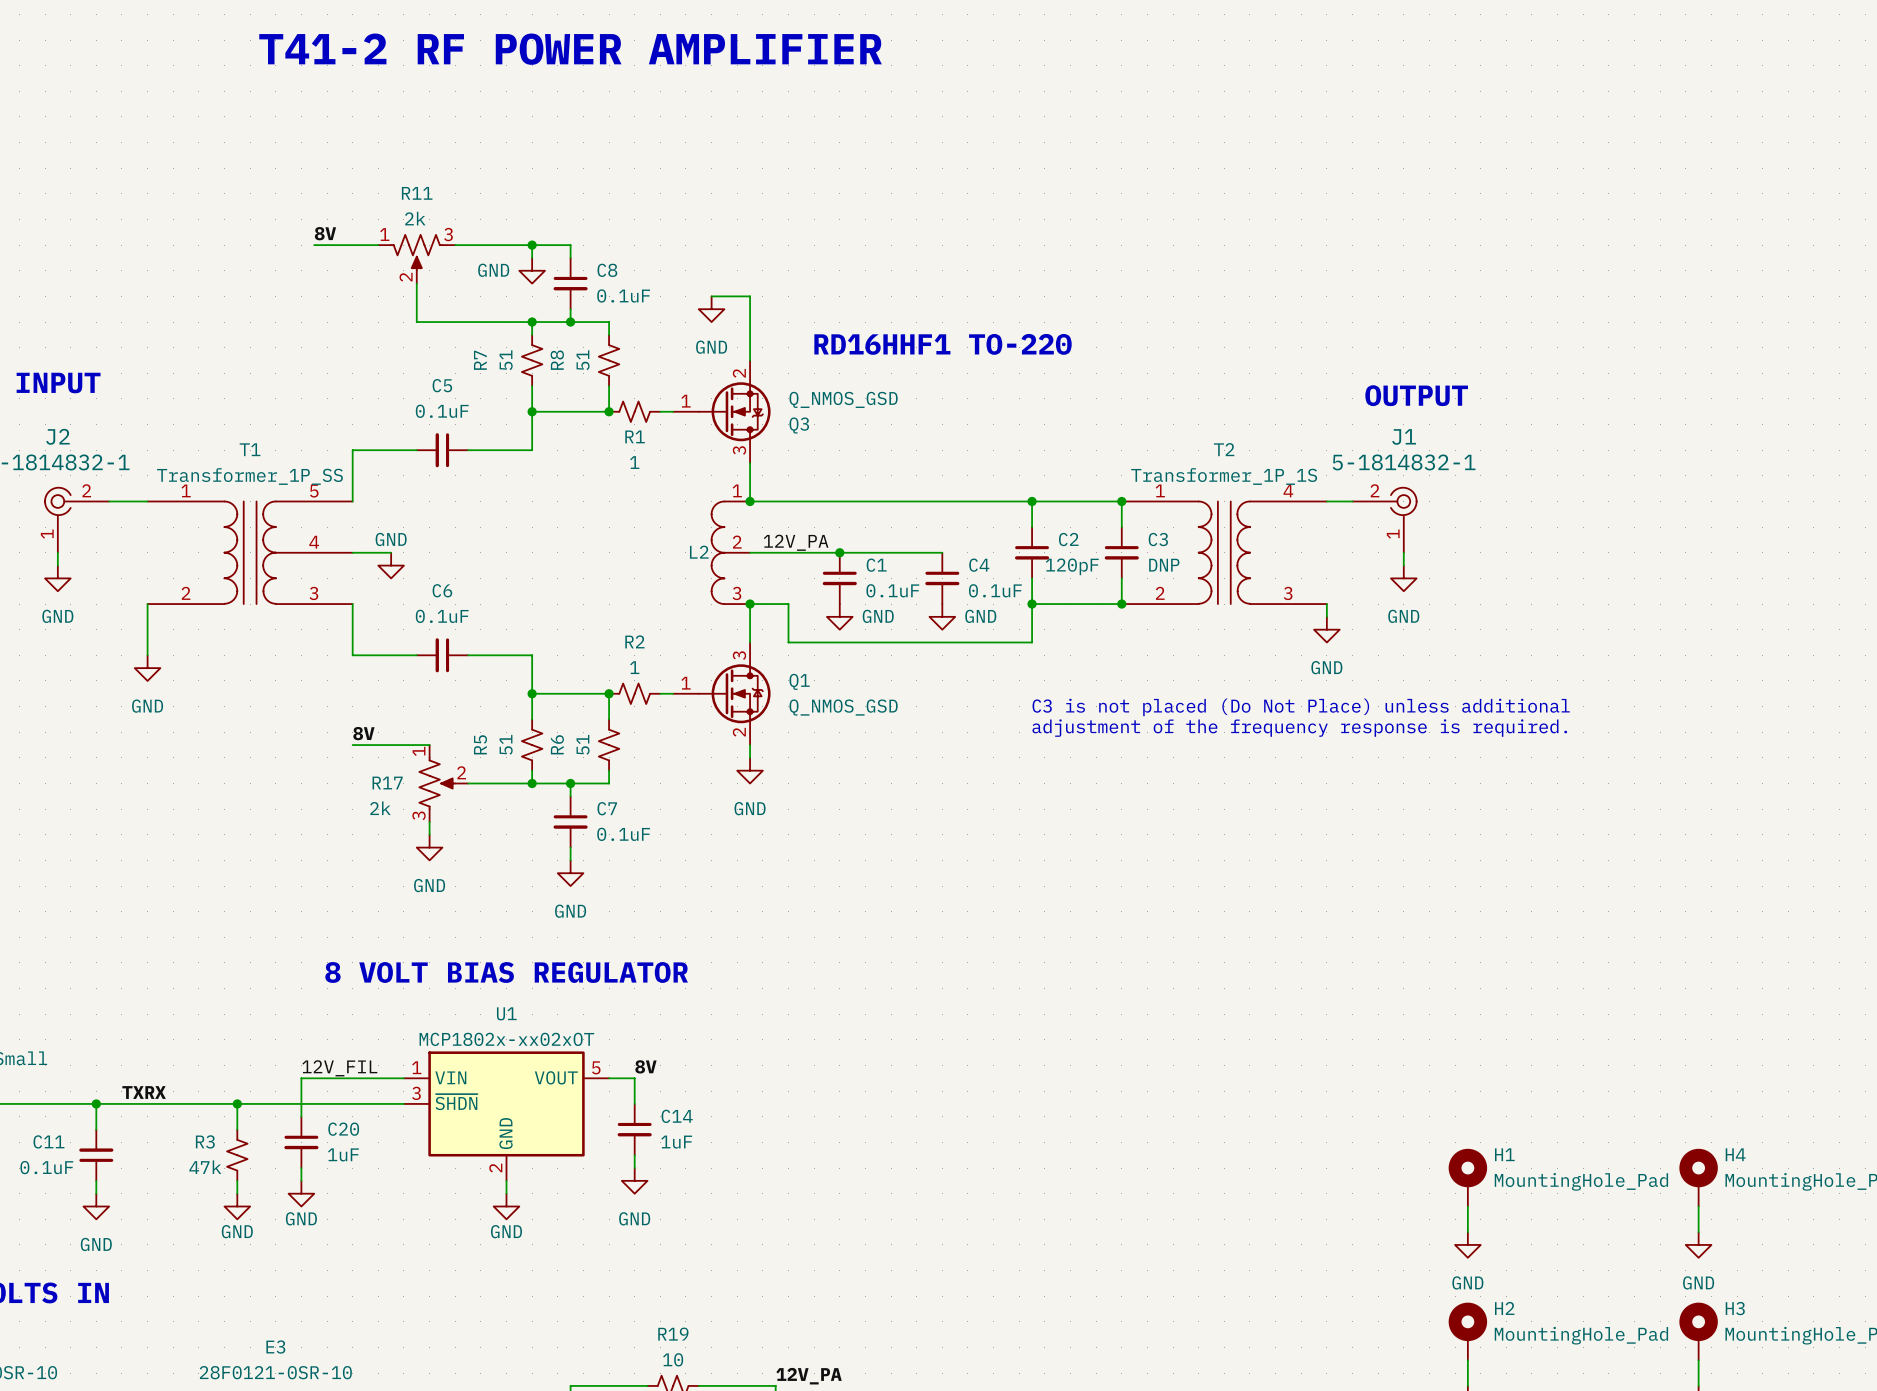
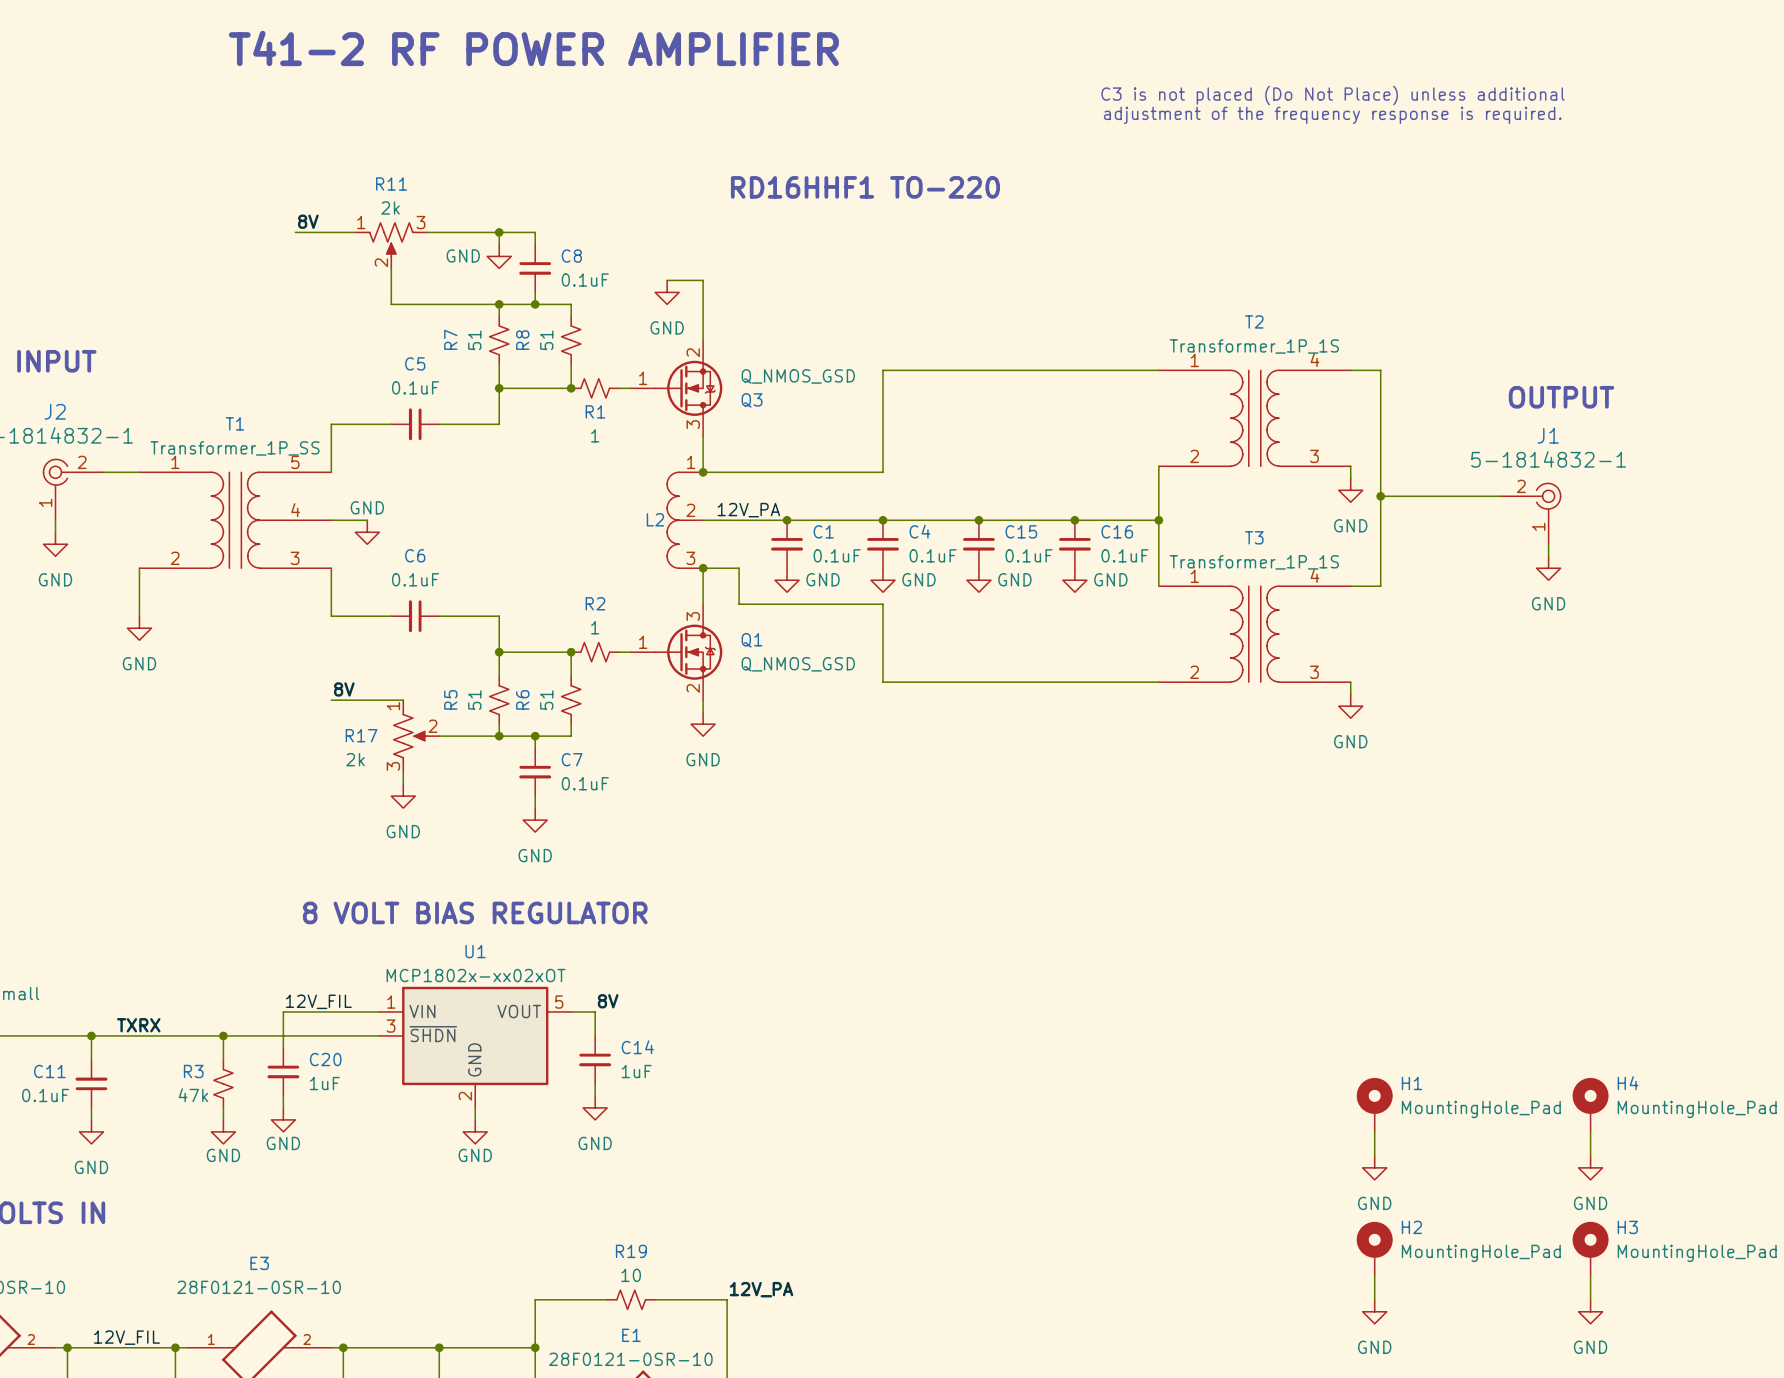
text: none -> C3 is not placed (Do Not Place) unless additional (1333, 95)
text: none -> adjustment of the frequency response is required. (1332, 115)
text position: RD16HHF1 TO-220 (943, 344) -> RD16HHF1 TO-220 (865, 187)
wire: none -> (1350, 370) (1380, 370) (1380, 586) (1350, 586)
text position: OUTPUT (1416, 395) -> OUTPUT (1561, 397)
wire: none -> (1158, 466) (1158, 586)
wire: (942, 501) (1121, 501) (1121, 527) -> (883, 472) (883, 370) (1158, 370)
wire: (1032, 501) (1032, 527) -> none
junction: (1032, 501) -> none
junction: (1121, 501) -> none
wire: (1326, 501) (1352, 501) -> none
J1 position: (1384, 520) -> (1530, 513)
wire: none -> (1380, 496) (1500, 496)
junction: none -> (1380, 496)
wire: none -> (883, 520) (1158, 520)
junction: none -> (883, 520)
C2: 120pF (1032, 552) -> none
junction: none -> (978, 520)
C3: DNP (1121, 552) -> none
junction: none -> (1074, 520)
T2 position: (1224, 552) -> (1254, 418)
junction: none -> (1158, 520)
wire: (1403, 552) (1403, 565) -> (1350, 466) (1350, 478)
wire: (1032, 578) (1032, 642) (942, 642) -> (1158, 682) (883, 682) (883, 604)
C15: none -> 0.1uF (978, 544)
wire: (1121, 578) (1121, 604) (1032, 604) -> none
C16: none -> 0.1uF (1074, 544)
power symbol position: GND (1403, 578) -> GND (1350, 490)
wire: none -> (1548, 544) (1548, 556)
junction: (1032, 604) -> none
junction: (1121, 604) -> none
wire: (1326, 604) (1326, 616) -> (1350, 682) (1350, 694)
power symbol: none -> GND (1548, 568)
power symbol: none -> GND (978, 580)
power symbol: none -> GND (1074, 580)
power symbol: GND (1326, 629) -> none
T3: none -> Transformer_1P_1S (1254, 634)
text: C3 is not placed (Do Not Place) unless additional (1301, 707) -> none
text: adjustment of the frequency response is required. (1299, 728) -> none
power symbol: none -> GND (1350, 706)

